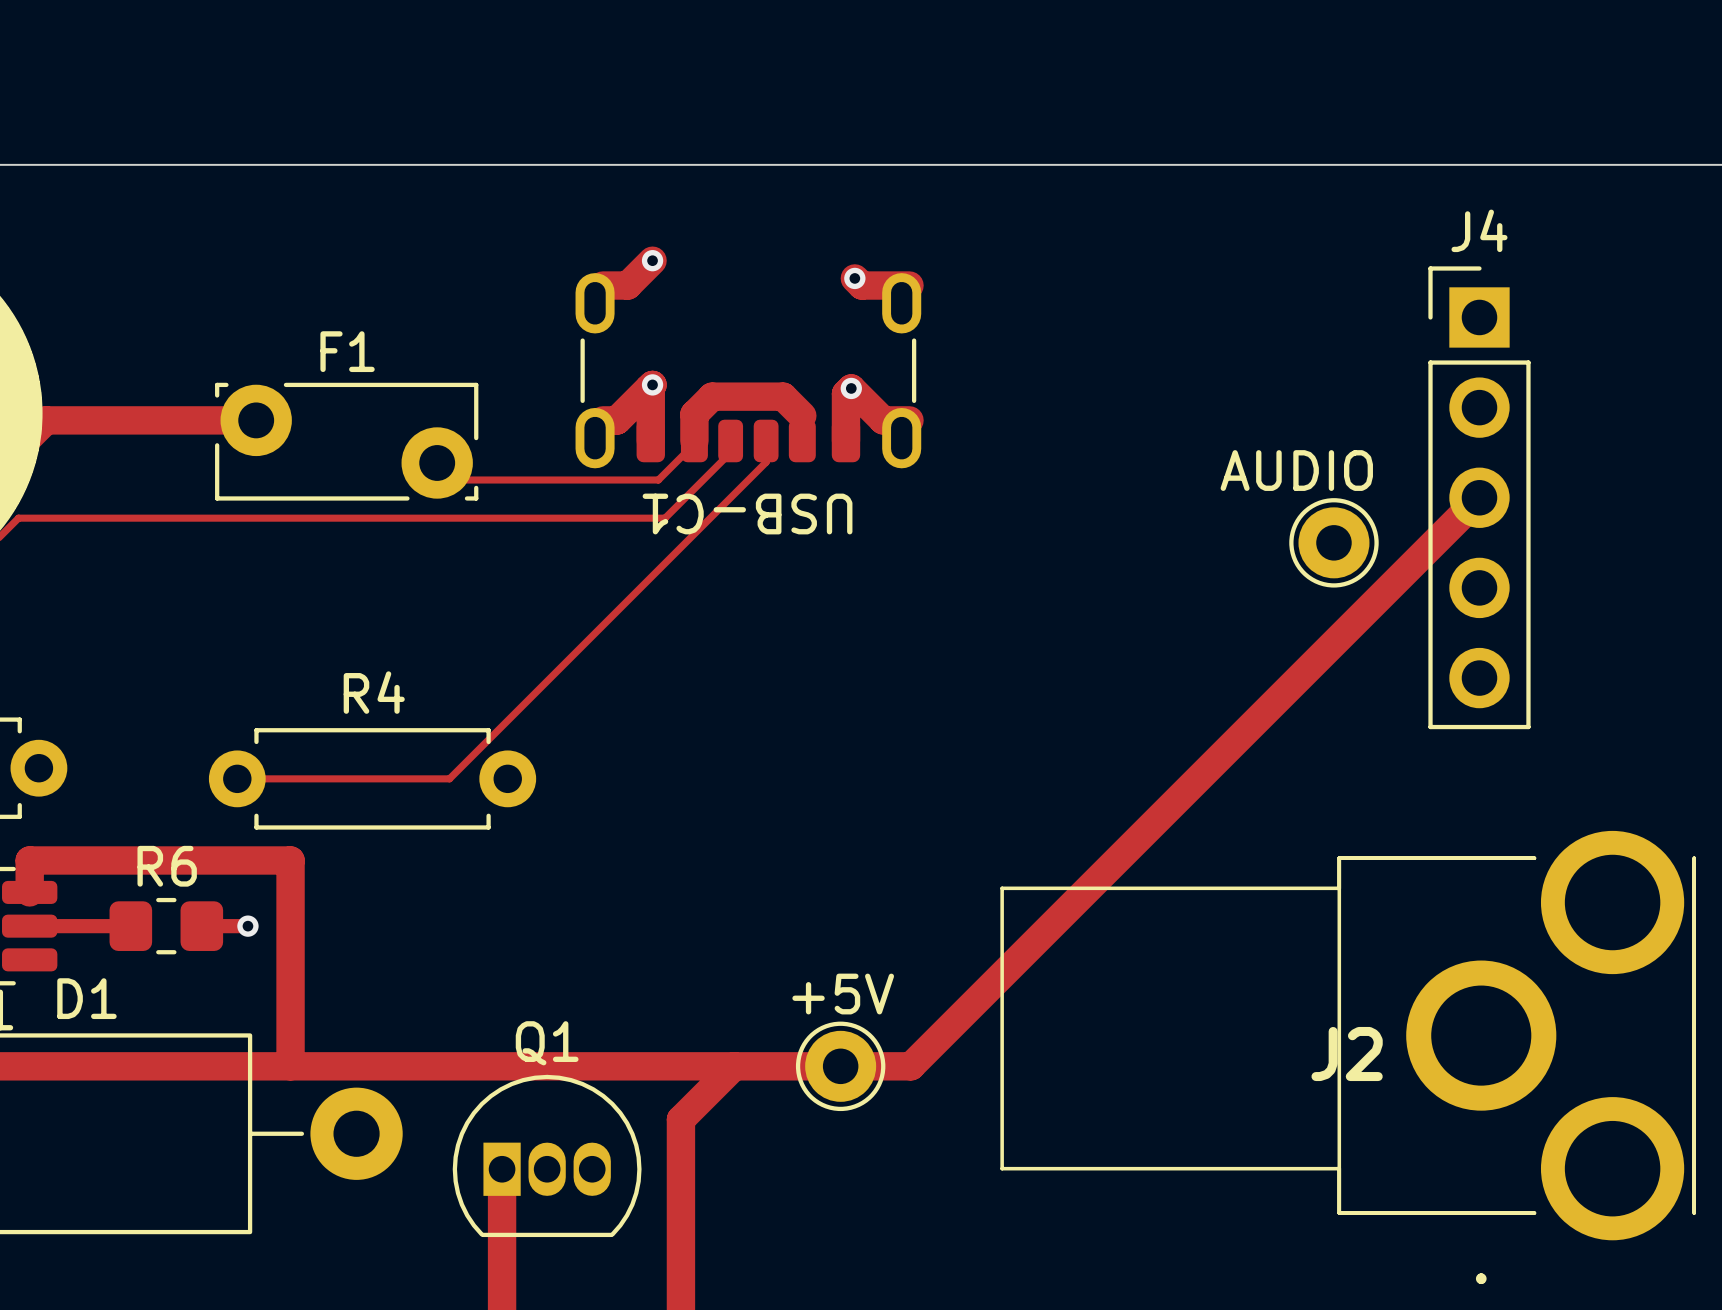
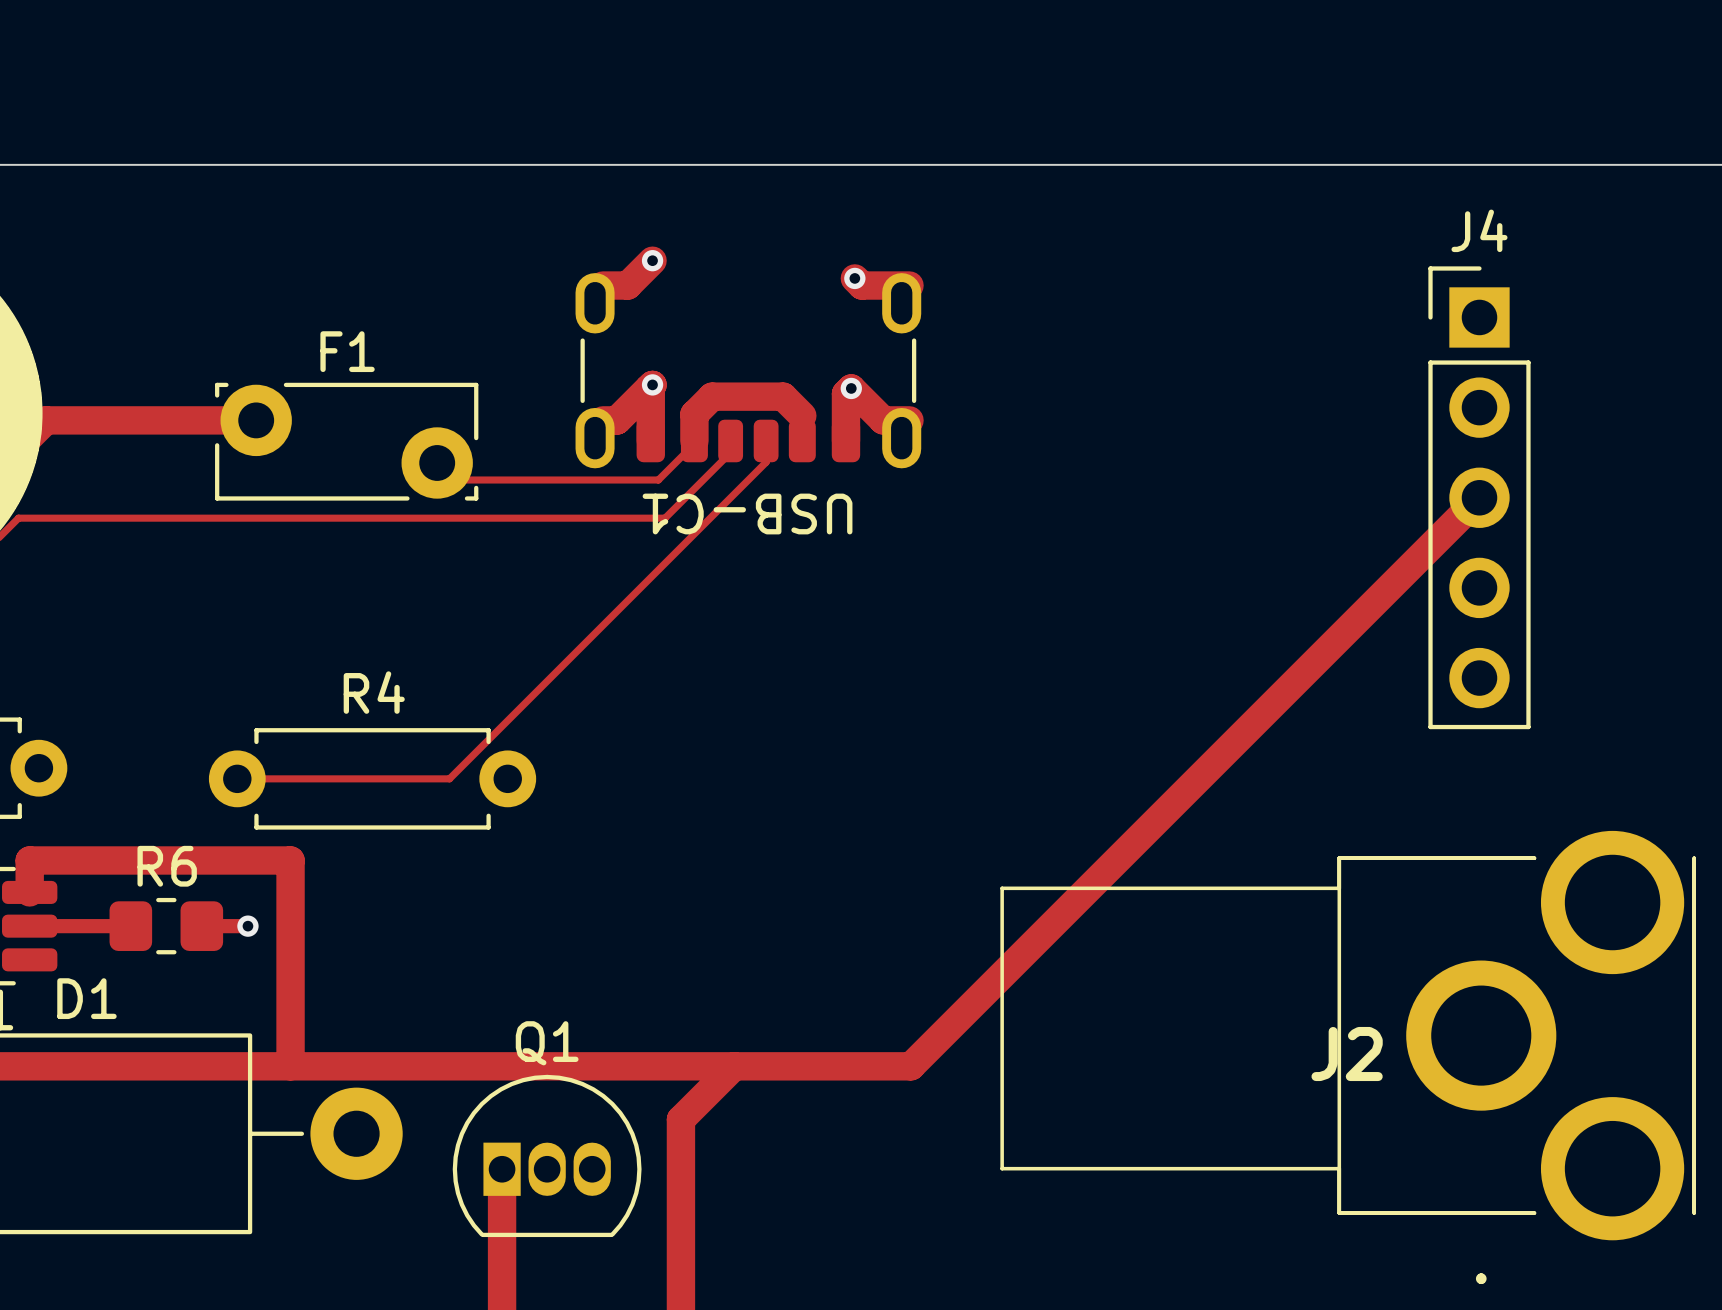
part: AUDIO (1333, 542) -> none
part: +5V (840, 1066) -> none

